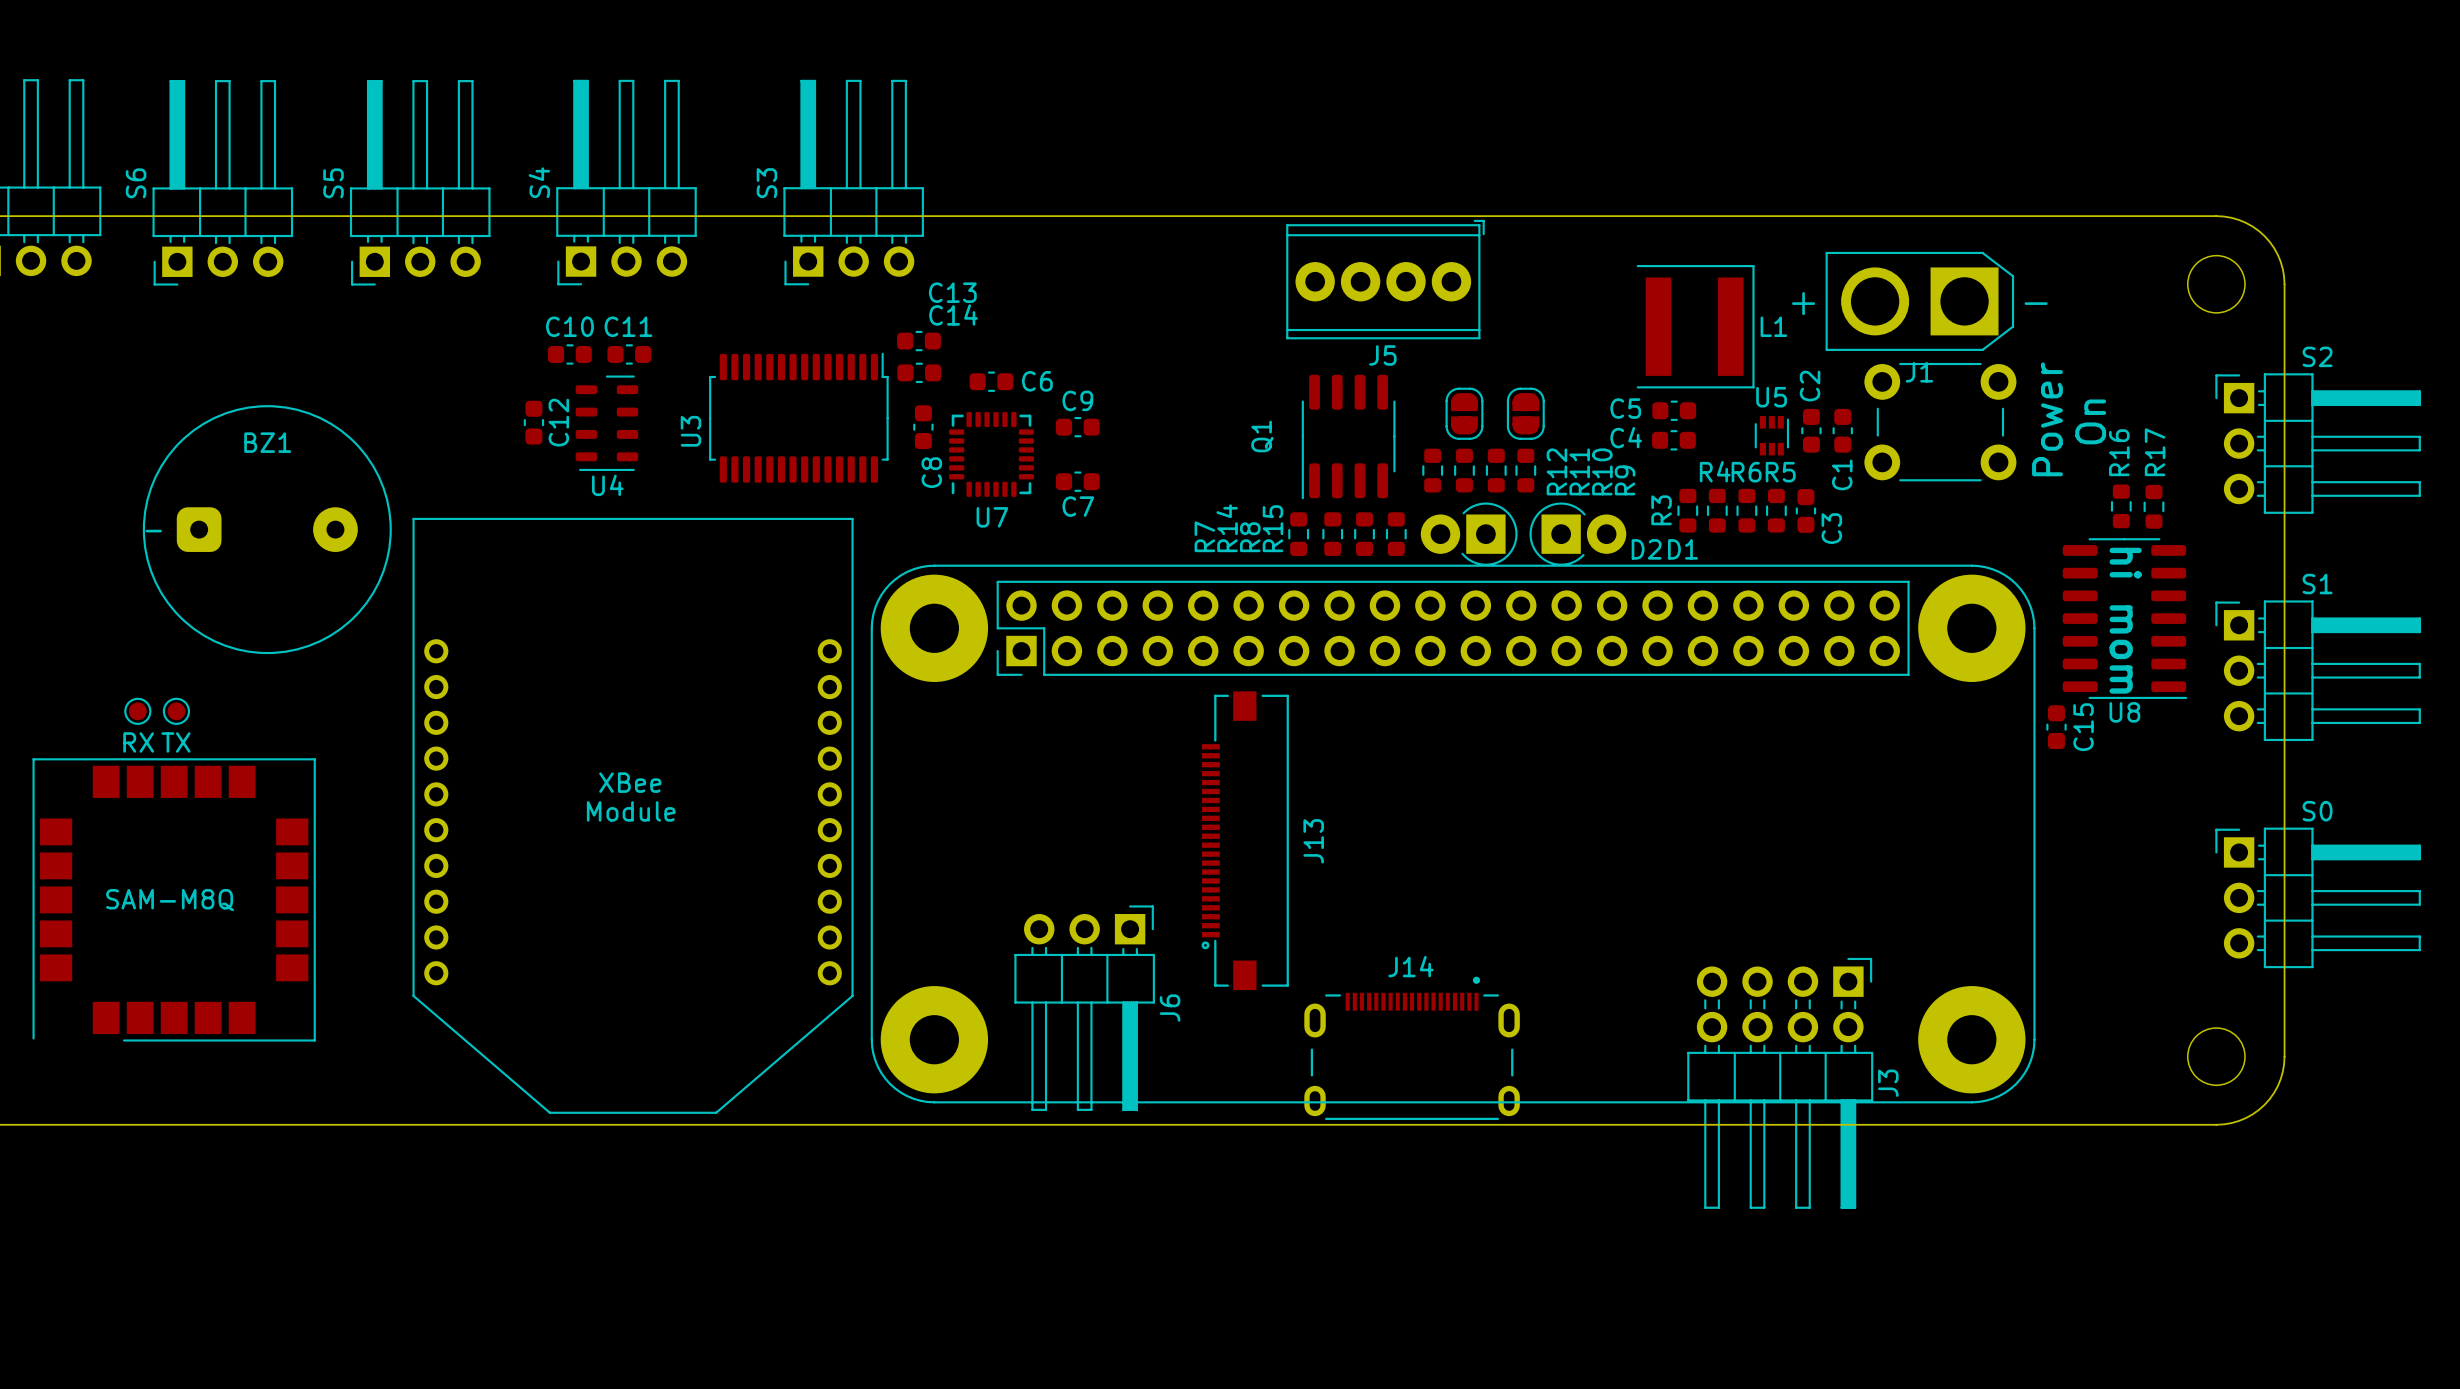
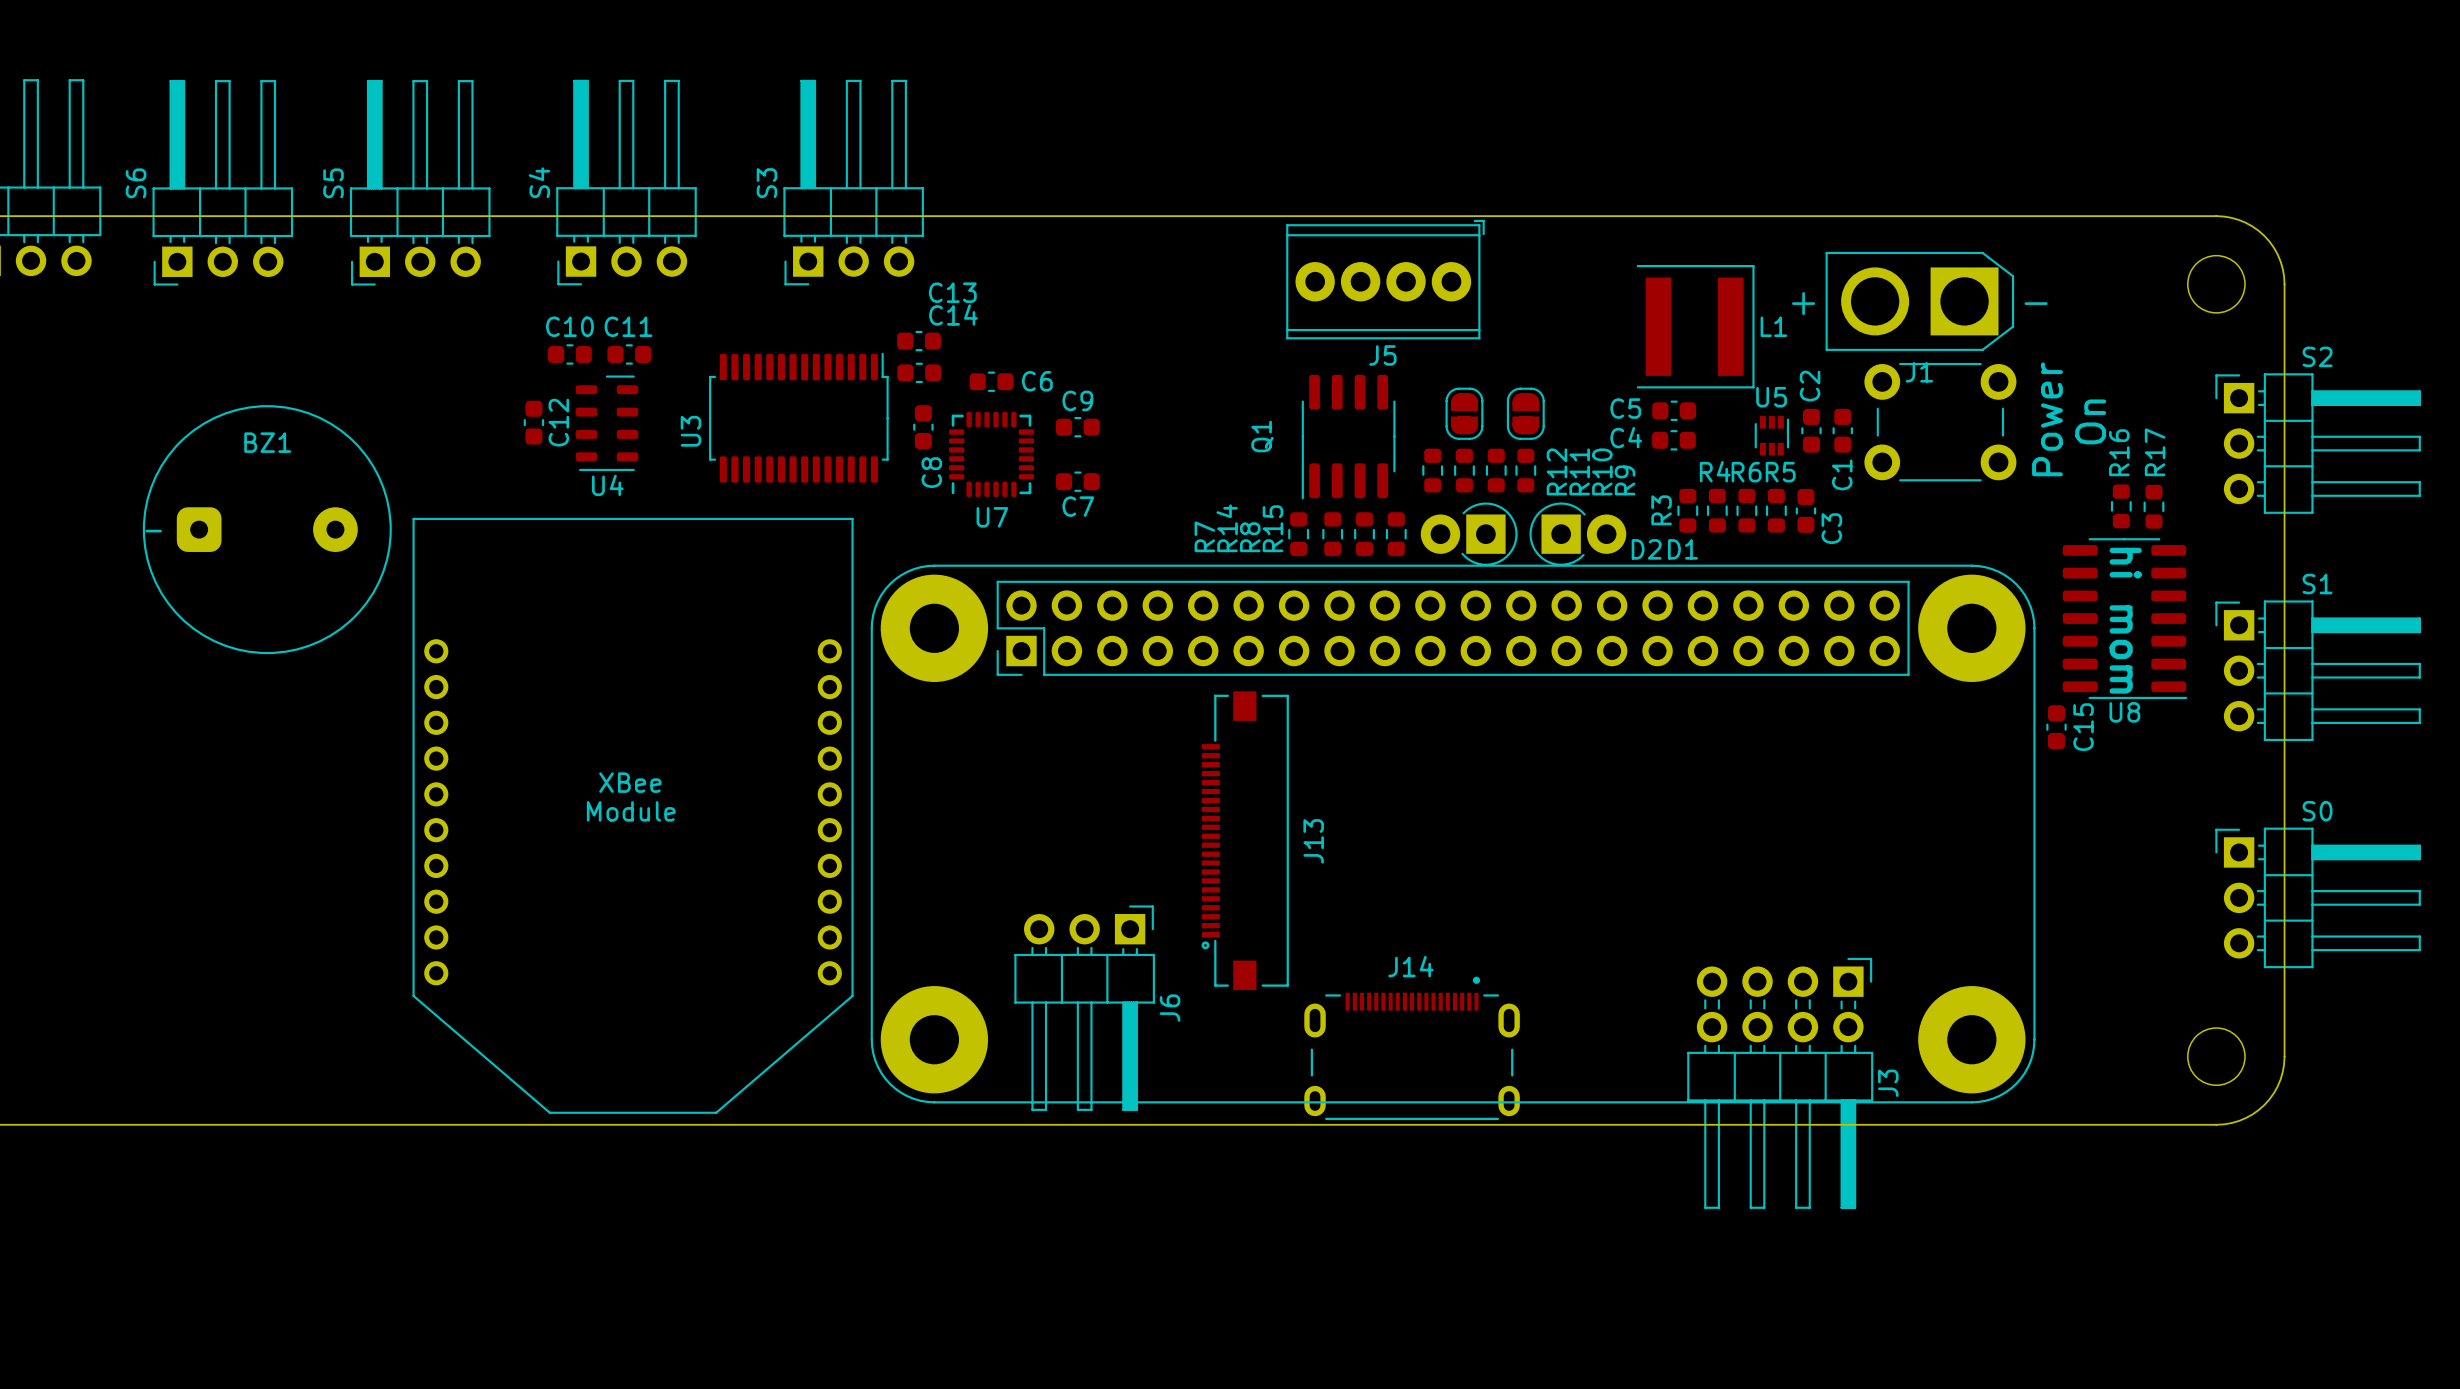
part: RX (137, 711) -> none
part: TX (176, 711) -> none
part: SAM-M8Q (174, 899) -> none

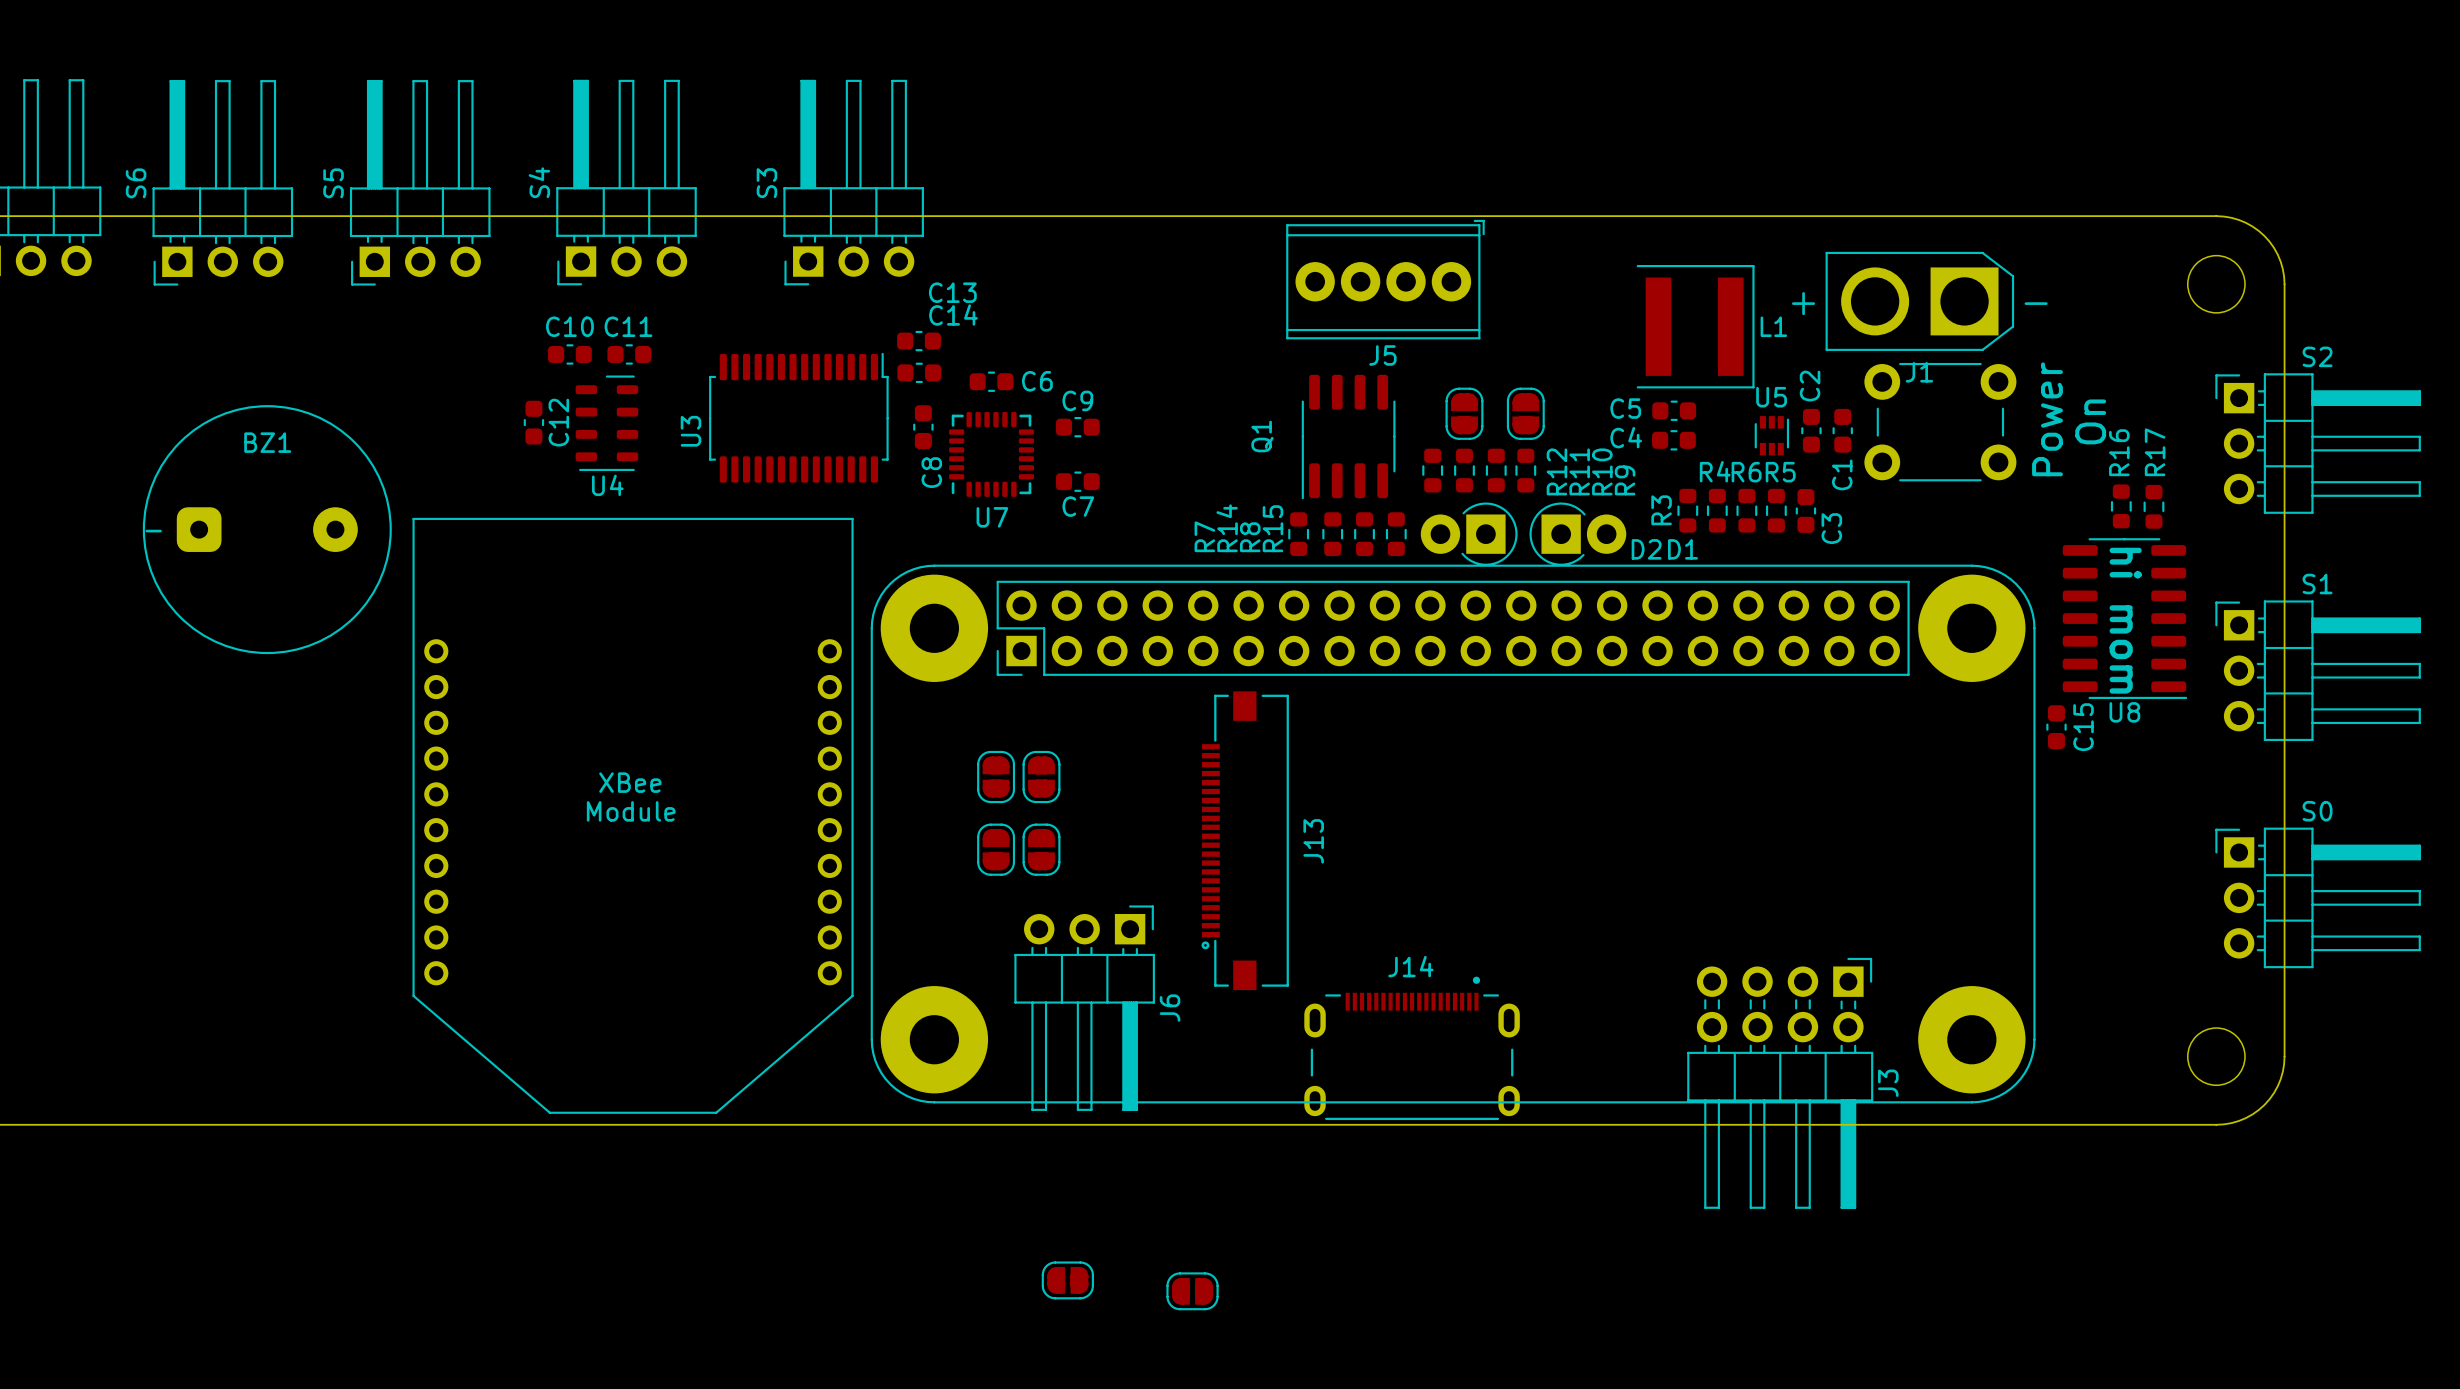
part: none -> (996, 777)
part: none -> (1041, 777)
part: none -> (996, 849)
part: none -> (1041, 849)
part: none -> (1067, 1280)
part: none -> (1192, 1291)

